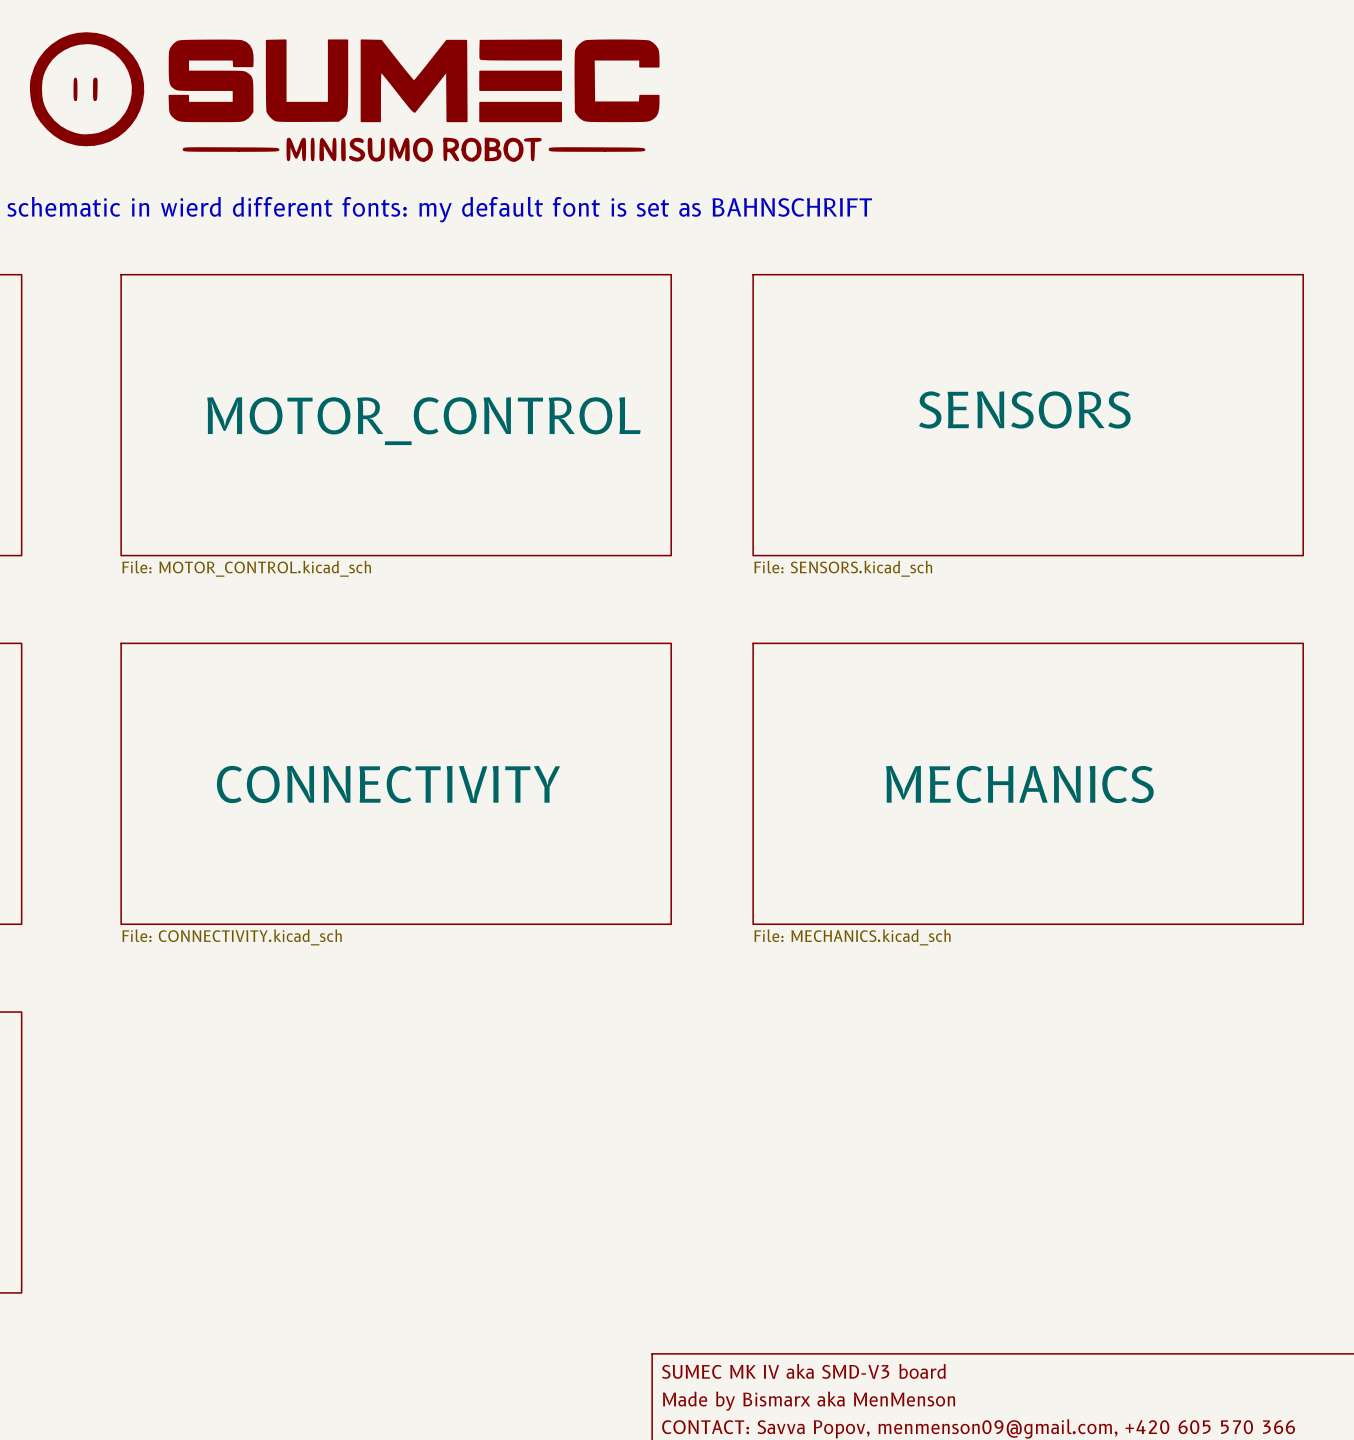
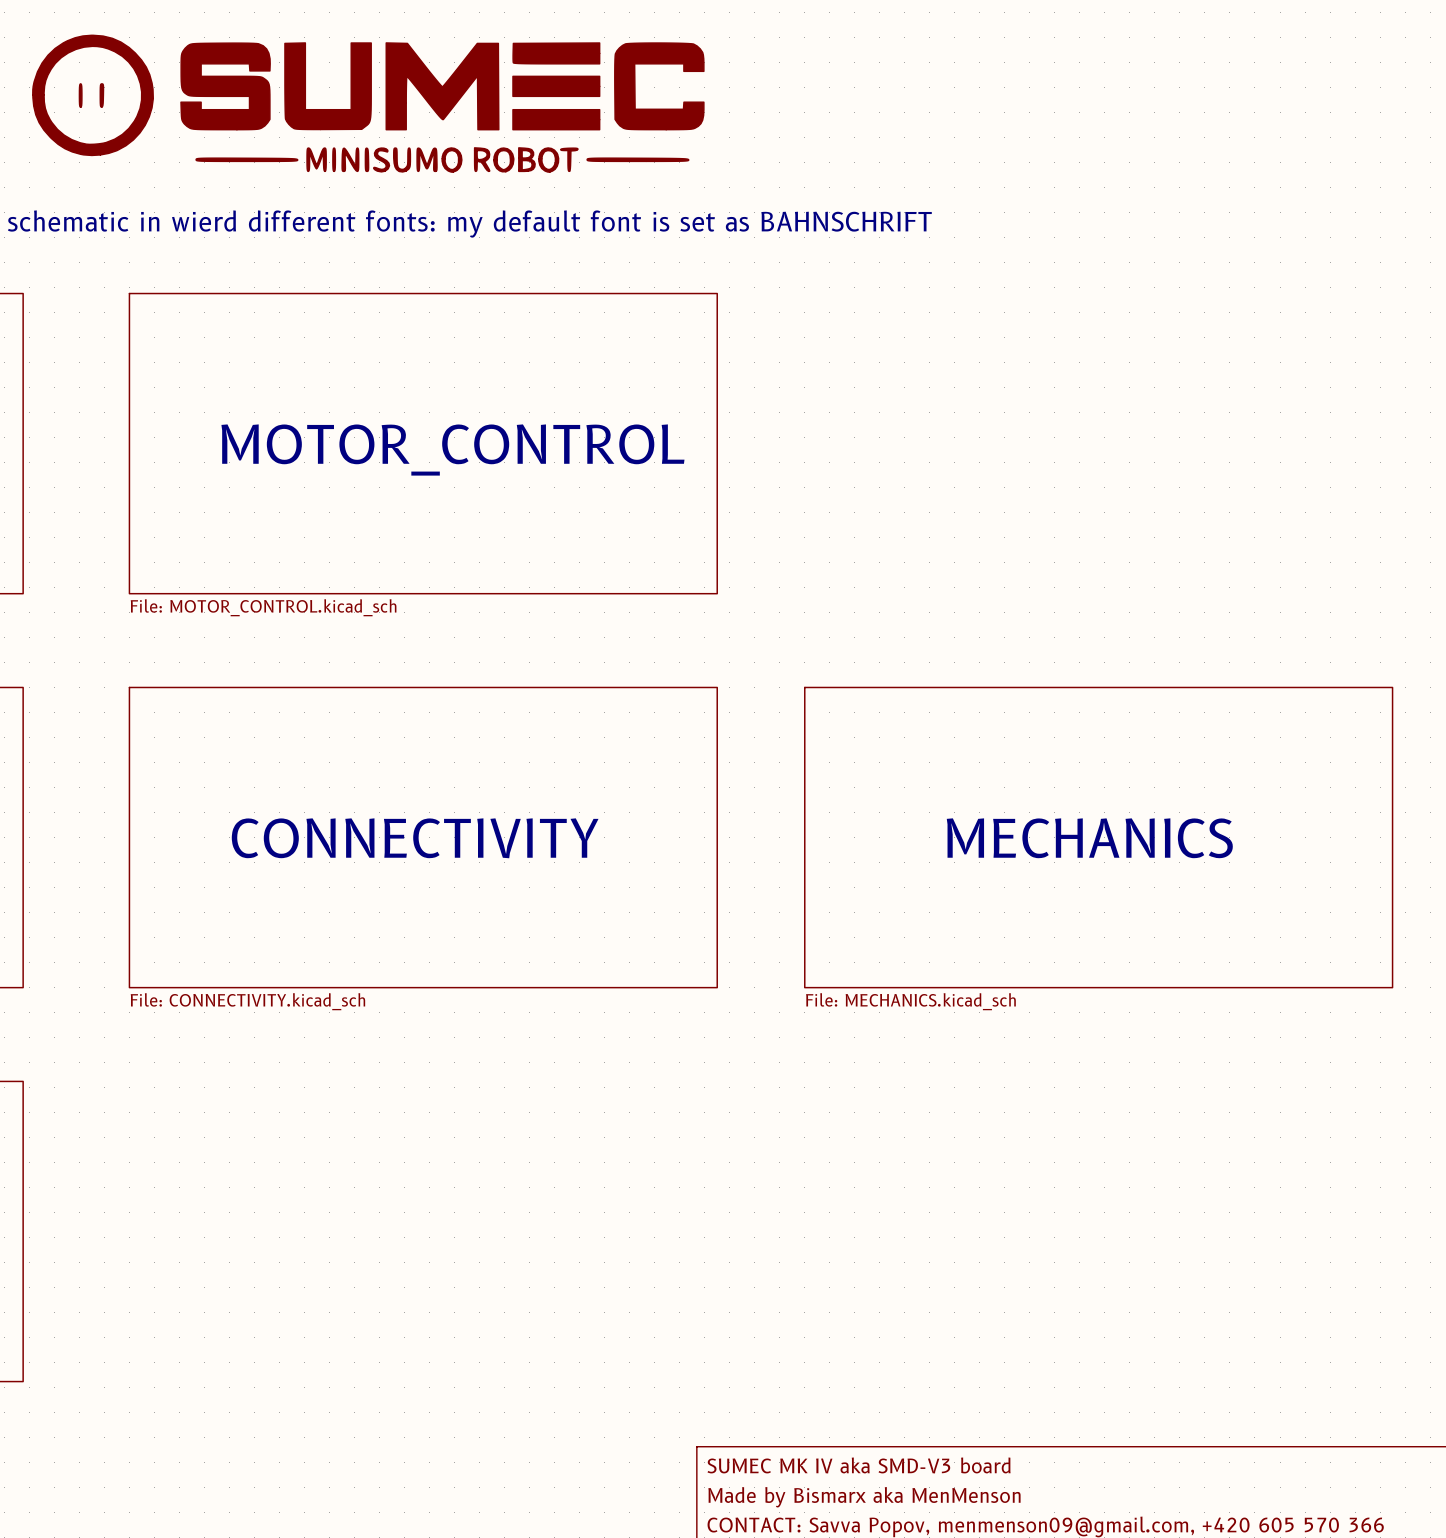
sheet SENSORS: File: SENSORS.kicad_sch (1028, 415) -> none

